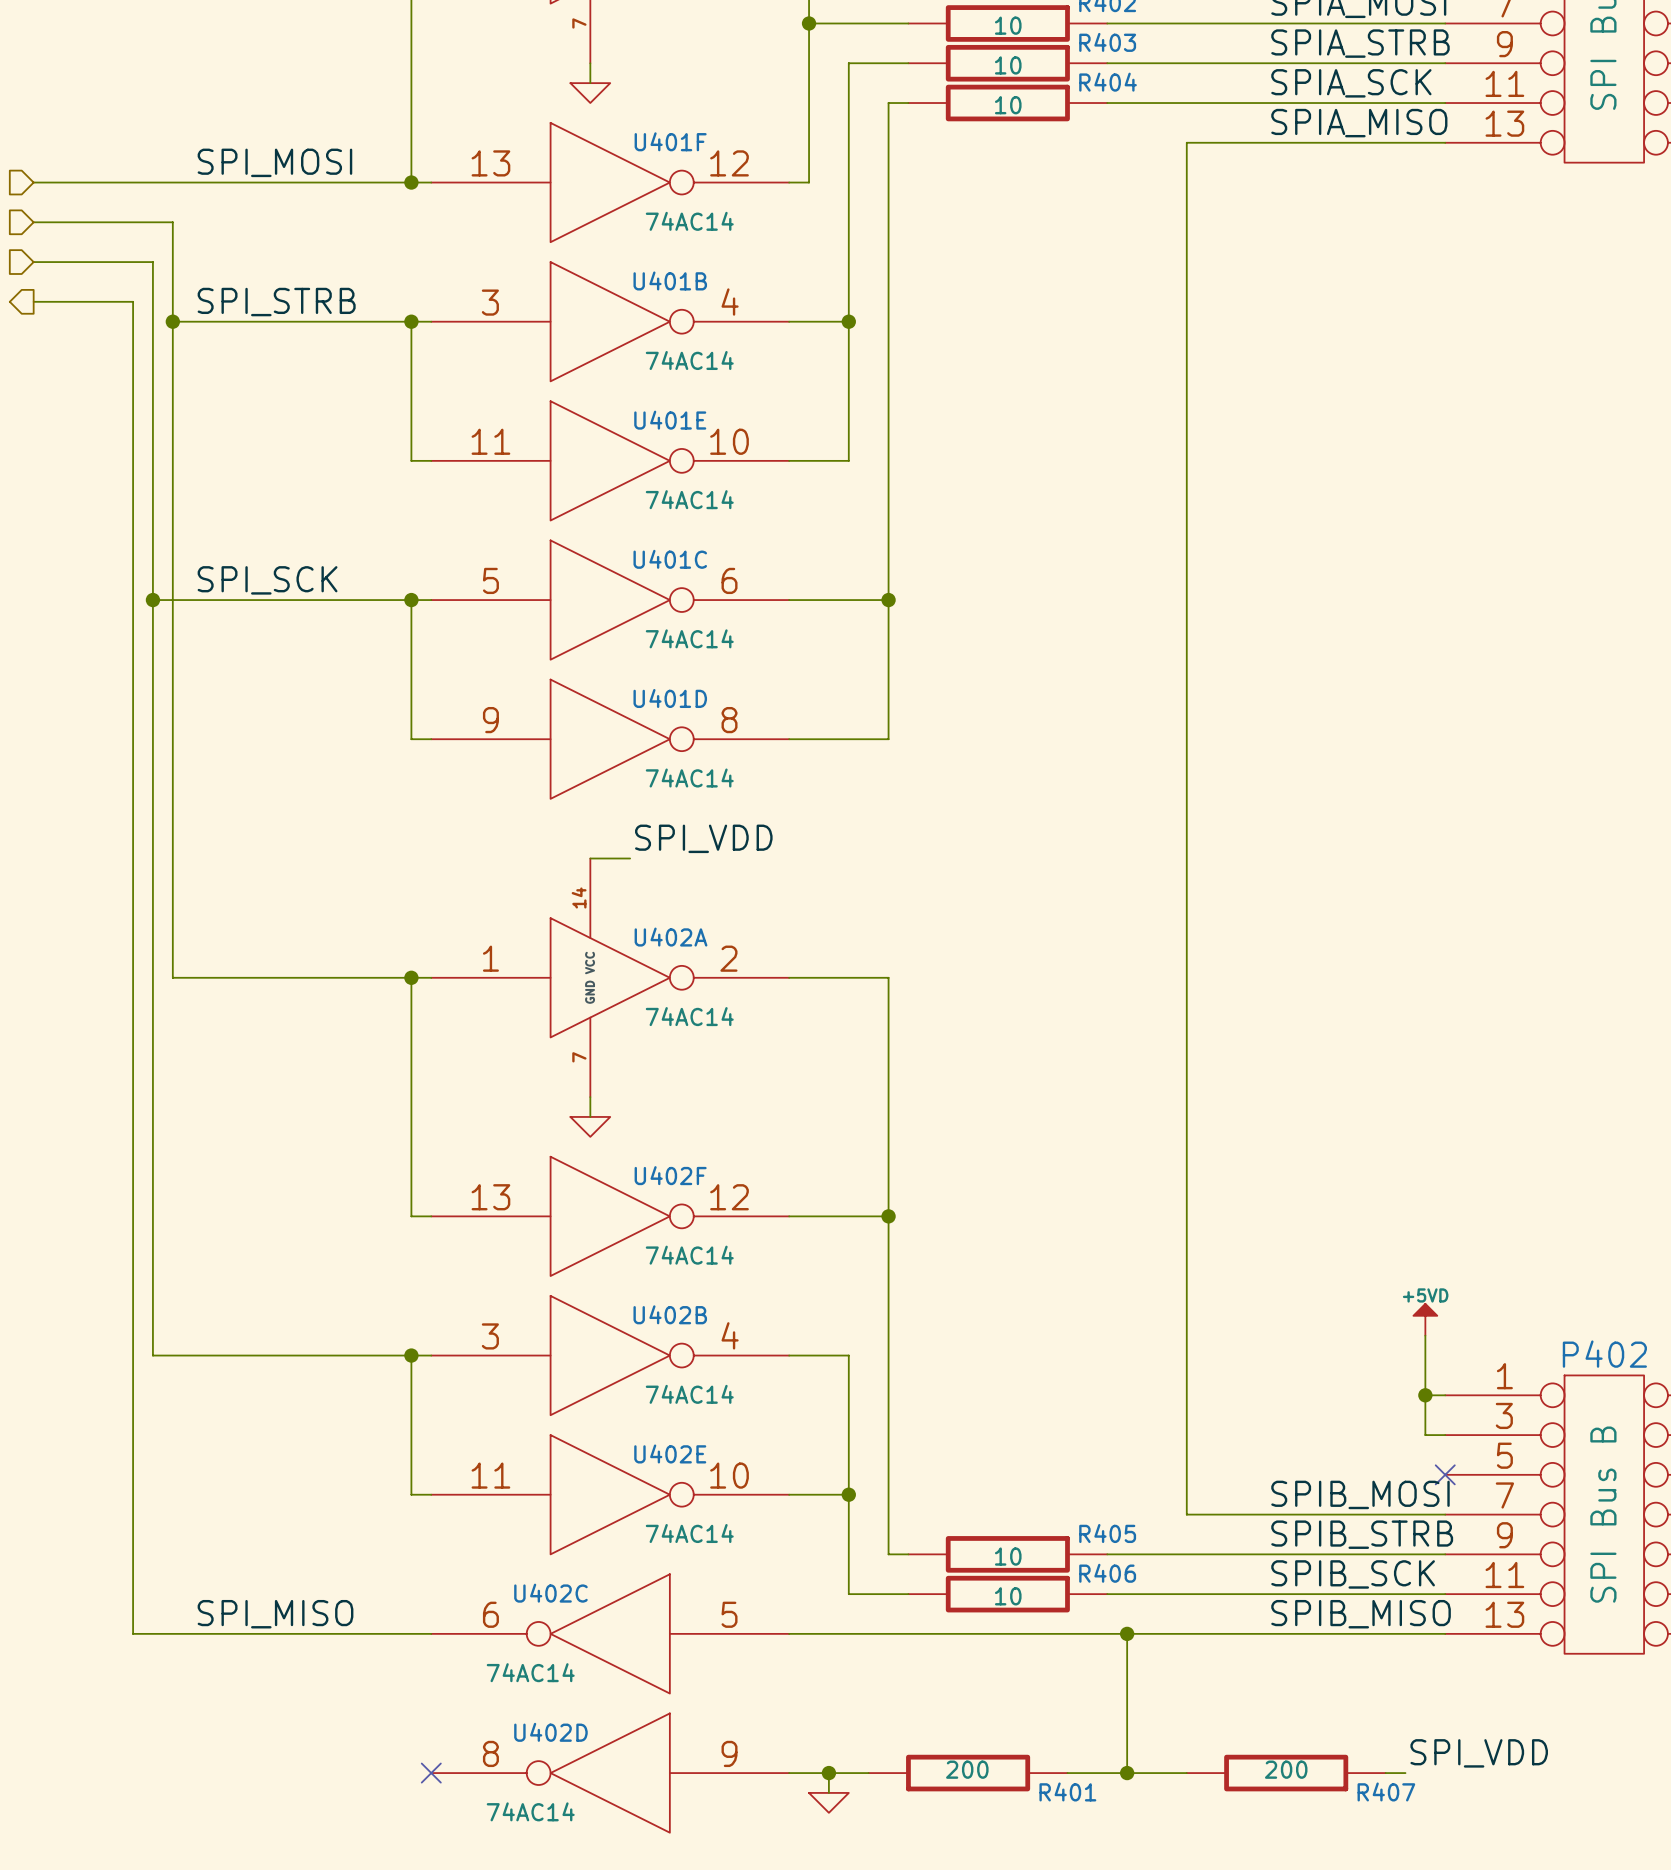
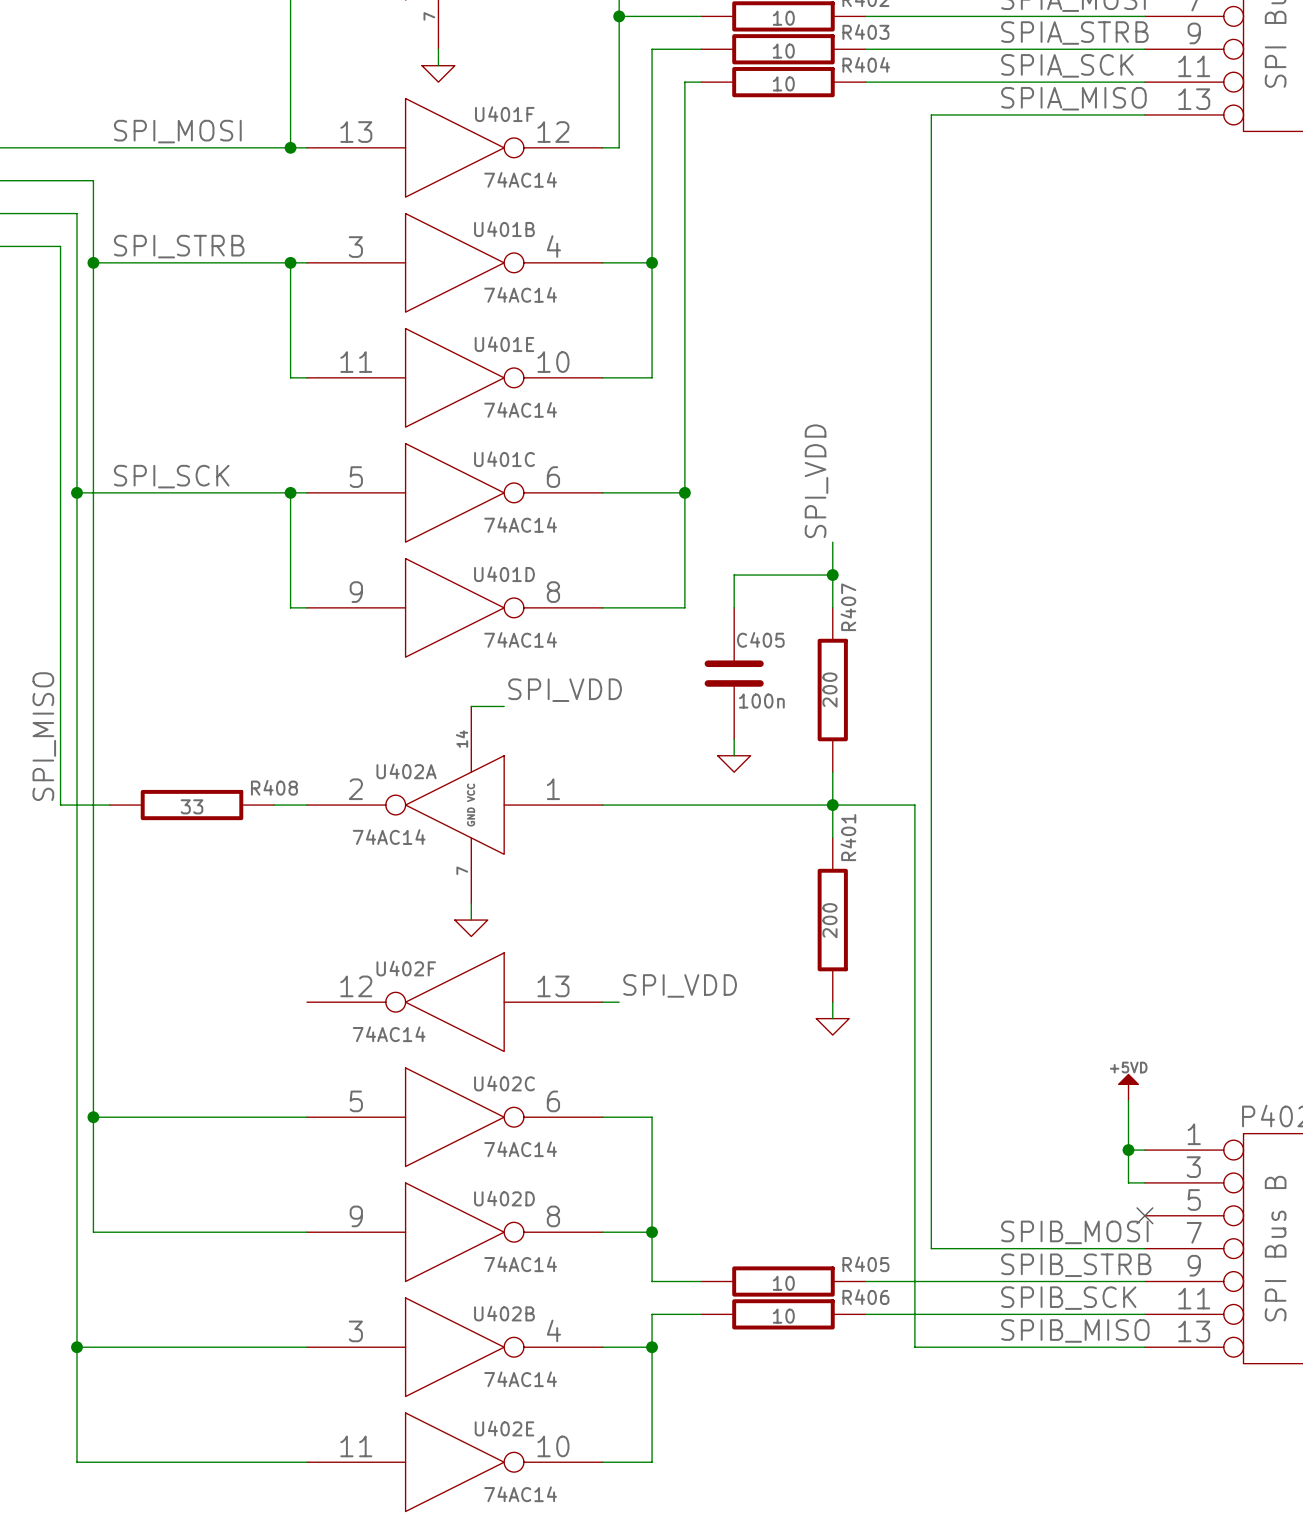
label: none -> SPI_VDD (816, 481)
wire: none -> (832, 542) (832, 607)
wire: none -> (832, 575) (734, 575) (734, 607)
junction: none -> (832, 575)
C405: none -> 100n (734, 673)
label position: SPI_VDD (703, 838) -> SPI_VDD (565, 690)
wire: (590, 858) (630, 858) -> (504, 706) (471, 706)
label: none -> SPI_MISO (44, 736)
wire: none -> (734, 739) (734, 755)
power symbol: none -> (734, 763)
wire: none -> (832, 772) (832, 837)
wire: (133, 977) (133, 1633) (152, 1633) -> (60, 805) (93, 805) (93, 1232) (290, 1232)
wire: (192, 977) (391, 977) -> none
R408: none -> 33 (191, 805)
wire: (411, 977) (411, 1216) (431, 1216) -> none
junction: (411, 977) -> none
U402A flip: as is (610, 977) -> left-right (454, 805)
wire: (888, 977) (888, 1554) -> (684, 805) (914, 805) (914, 1347)
junction: none -> (832, 805)
wire: (590, 1097) (590, 1116) -> (471, 903) (471, 920)
power symbol position: (590, 1126) -> (471, 928)
U402F name position: U402F (670, 1175) -> U402F (406, 968)
label: none -> SPI_VDD (680, 985)
U402F rotation: 0° (610, 1216) -> 180° (454, 1002)
wire: (809, 1216) (888, 1216) -> none
junction: (888, 1216) -> none
wire: none -> (832, 1002) (832, 1018)
power symbol: none -> (832, 1026)
U402F value position: 74AC14 (689, 1255) -> 74AC14 (389, 1034)
wire: (152, 1355) (172, 1355) -> (76, 1117) (76, 1462) (307, 1462)
junction: none -> (93, 1117)
wire: (411, 1355) (411, 1494) -> none
junction: (411, 1355) -> none
U402B position: (610, 1355) -> (454, 1347)
U402E position: (610, 1494) -> (454, 1462)
wire: (848, 1554) (848, 1594) -> (652, 1281) (684, 1281)
U402C name position: U402C (550, 1593) -> U402C (504, 1083)
label: SPI_MISO (275, 1614) -> none
junction: none -> (76, 1347)
U402C rotation: 0° (610, 1633) -> 180° (454, 1117)
U402C position: (610, 1633) -> (454, 1117)
wire: (848, 1633) (1166, 1633) -> none
junction: none -> (652, 1347)
wire: (1127, 1633) (1127, 1773) -> none
junction: (1127, 1633) -> none
U402C value position: 74AC14 (530, 1672) -> 74AC14 (520, 1149)
U402D name position: U402D (550, 1732) -> U402D (504, 1198)
label: SPI_VDD (1479, 1753) -> none
no-connect mark: (431, 1773) -> none
U402D rotation: 0° (610, 1773) -> 180° (454, 1232)
U402D position: (610, 1773) -> (454, 1232)
wire: (828, 1773) (828, 1792) -> none
junction: (828, 1773) -> none
wire: (848, 1773) (868, 1773) -> (652, 1462) (652, 1314)
R401 rotation: 0° (968, 1773) -> 90° clockwise (832, 920)
R401 position: (968, 1773) -> (832, 920)
wire: (1067, 1773) (1186, 1773) -> none
junction: (1127, 1773) -> none
R407 rotation: 0° (1286, 1773) -> 90° clockwise (832, 690)
R407 position: (1286, 1773) -> (832, 690)
wire: (1385, 1773) (1405, 1773) -> none
R401 name position: R401 (1067, 1791) -> R401 (848, 837)
R407 name position: R407 (1386, 1791) -> R407 (848, 607)
power symbol: (828, 1802) -> none
U402D value position: 74AC14 (530, 1811) -> 74AC14 (520, 1264)

